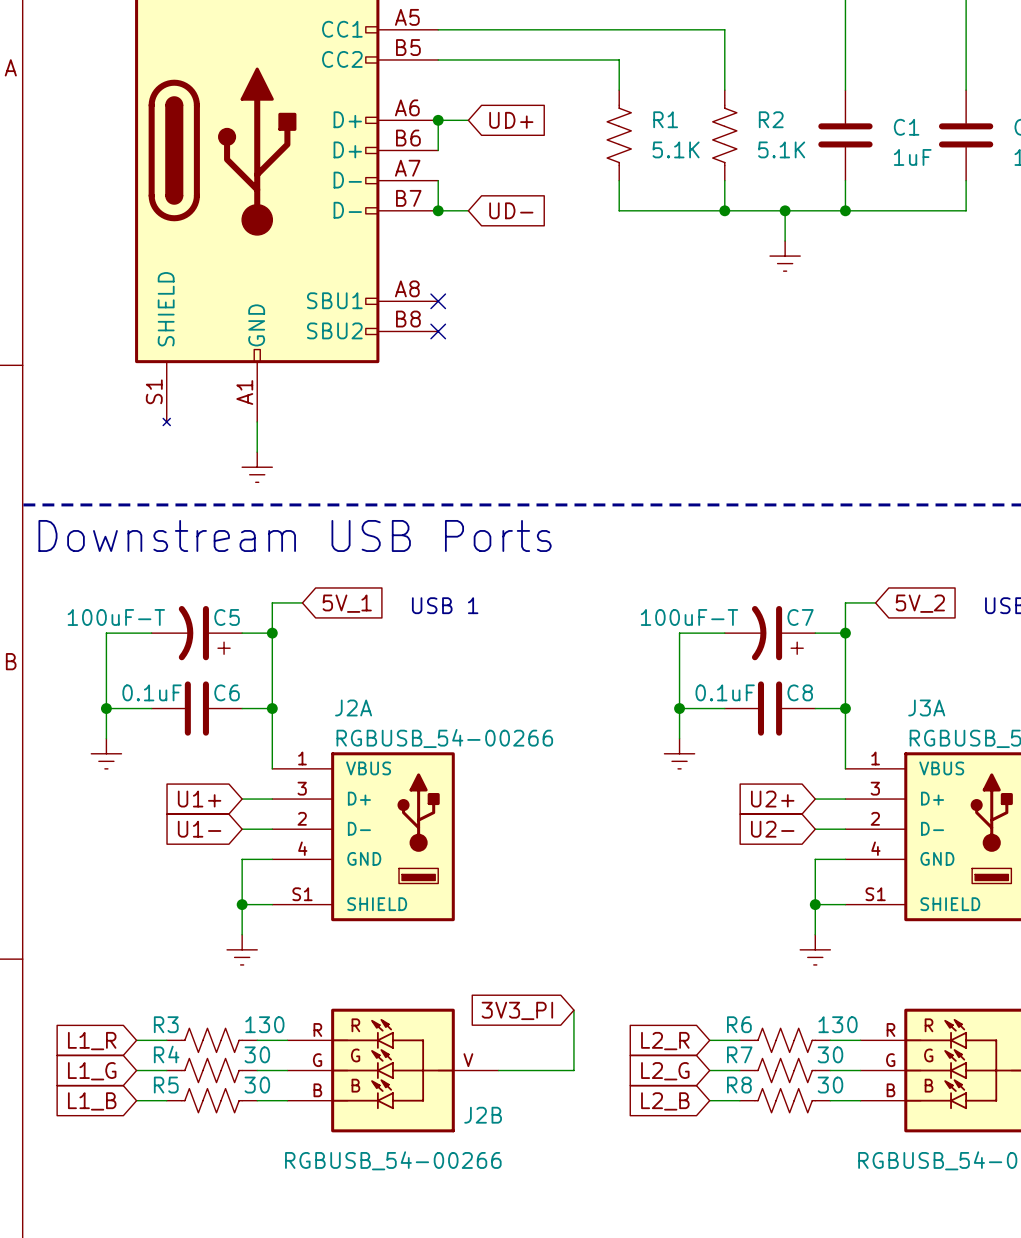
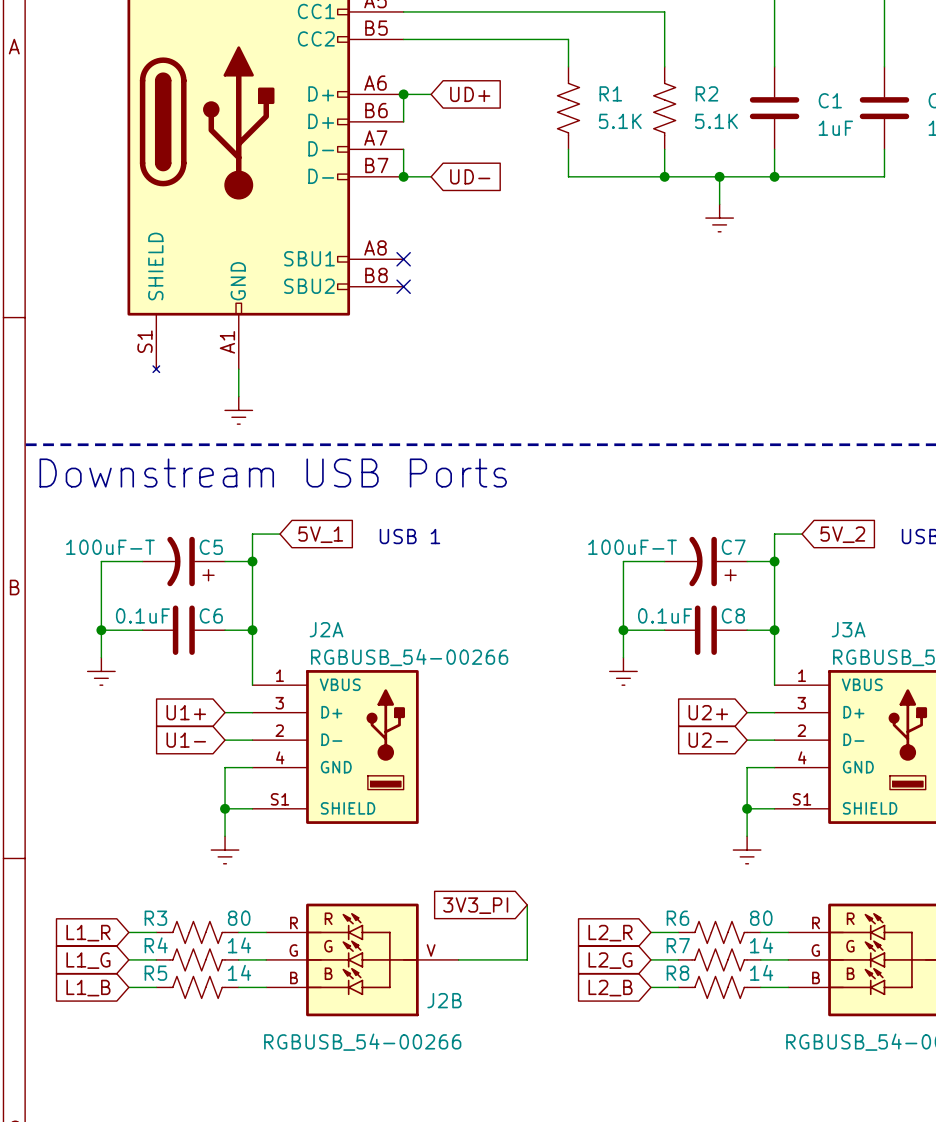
R3 value: 130 (264, 1024) -> 80 (239, 918)
R6 value: 130 (838, 1024) -> 80 (761, 918)
R4 value: 30 (257, 1054) -> 14 (239, 945)
R7 value: 30 (830, 1054) -> 14 (761, 945)
R5 value: 30 (257, 1085) -> 14 (239, 972)
R8 value: 30 (830, 1085) -> 14 (761, 972)

